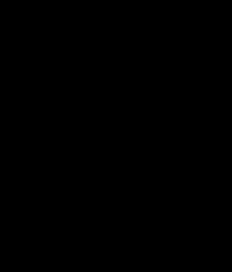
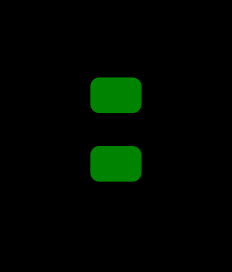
part: none -> (115, 129)

